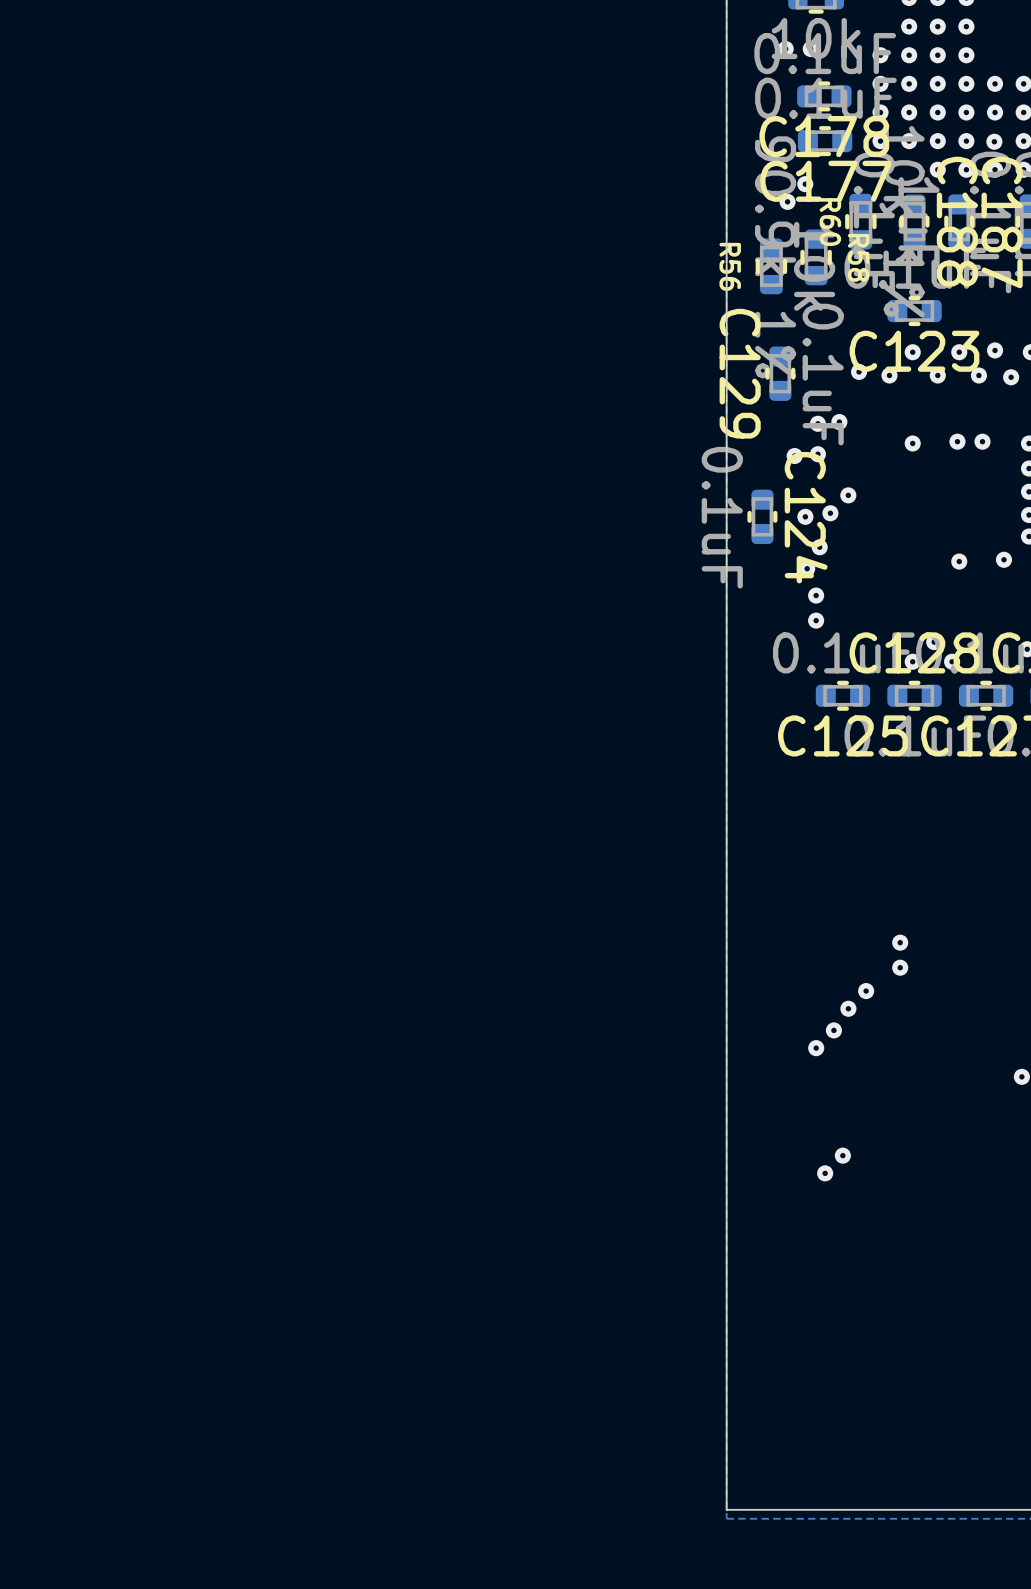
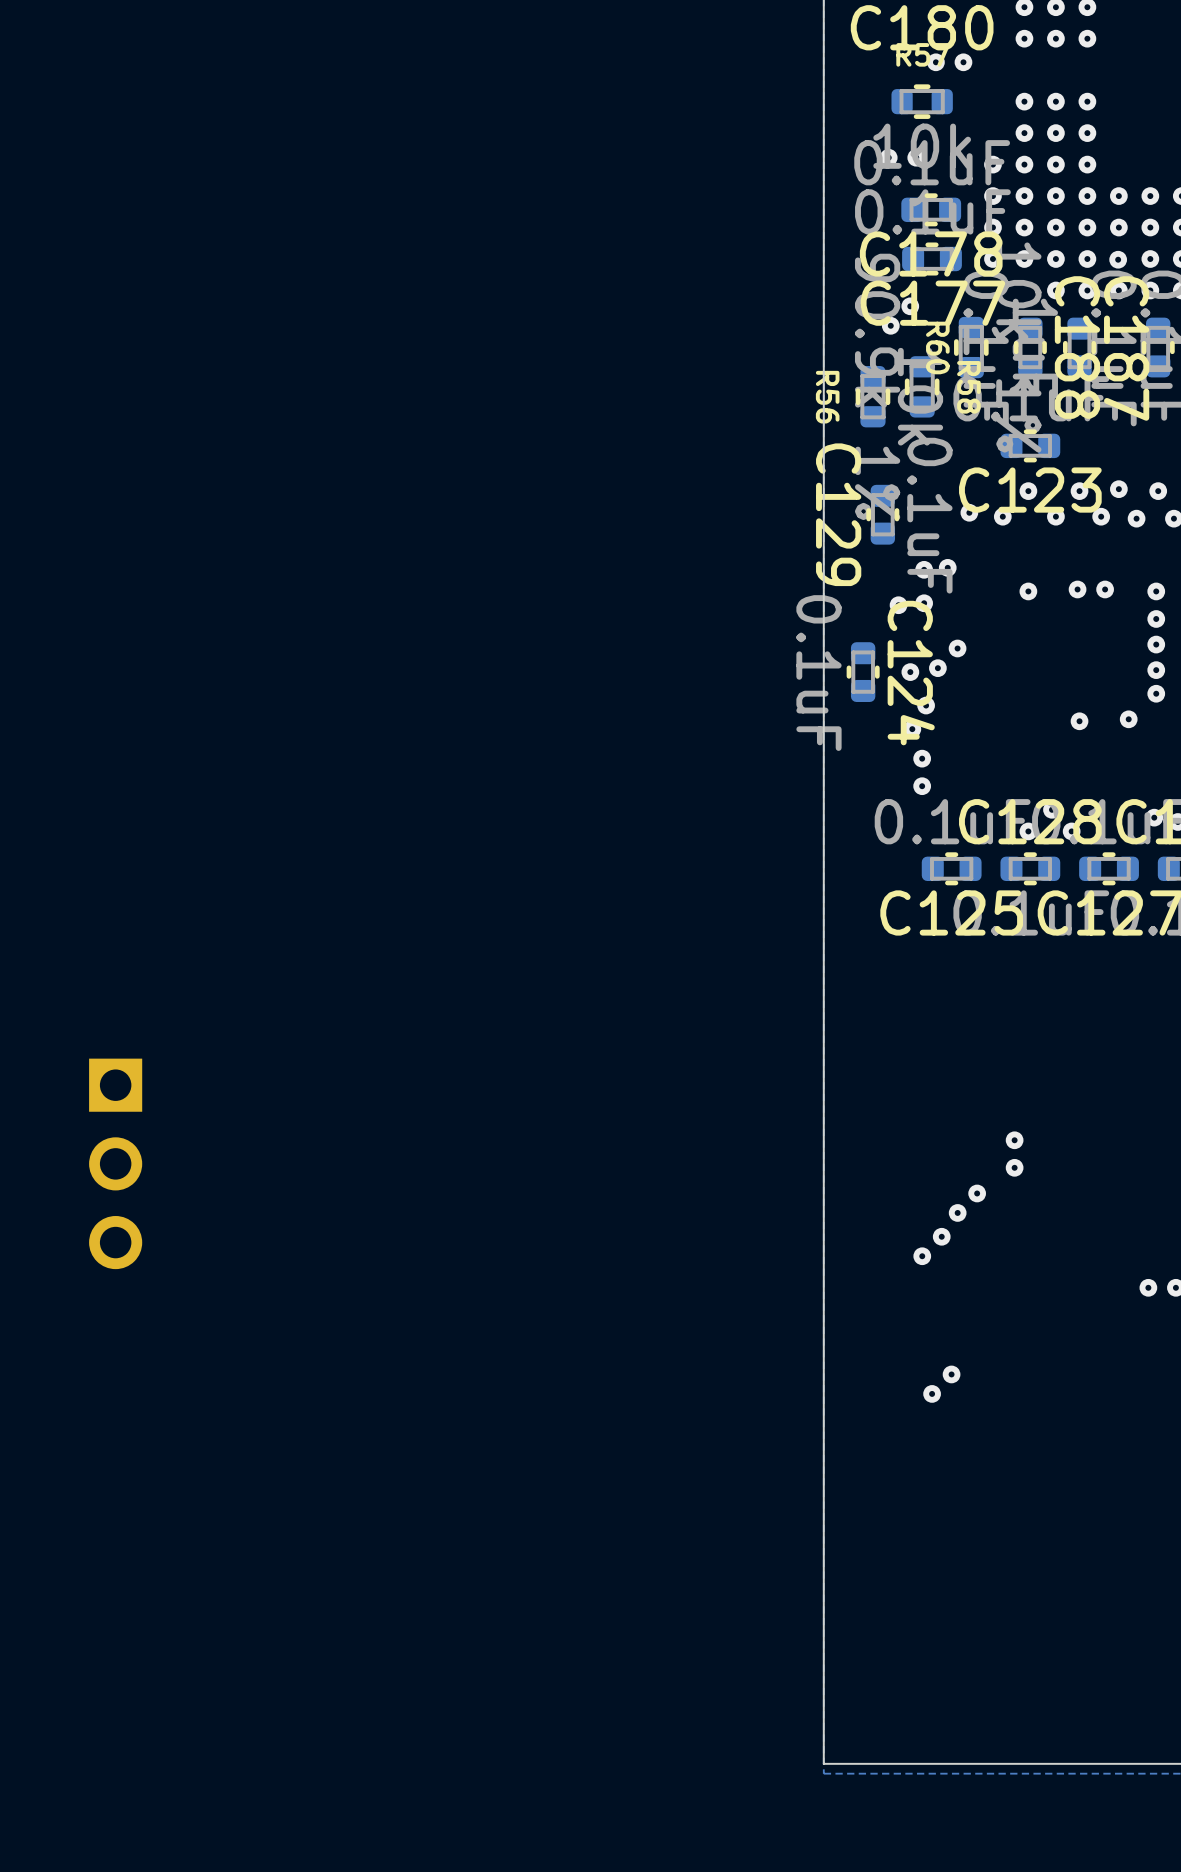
part: none -> (115, 1163)

